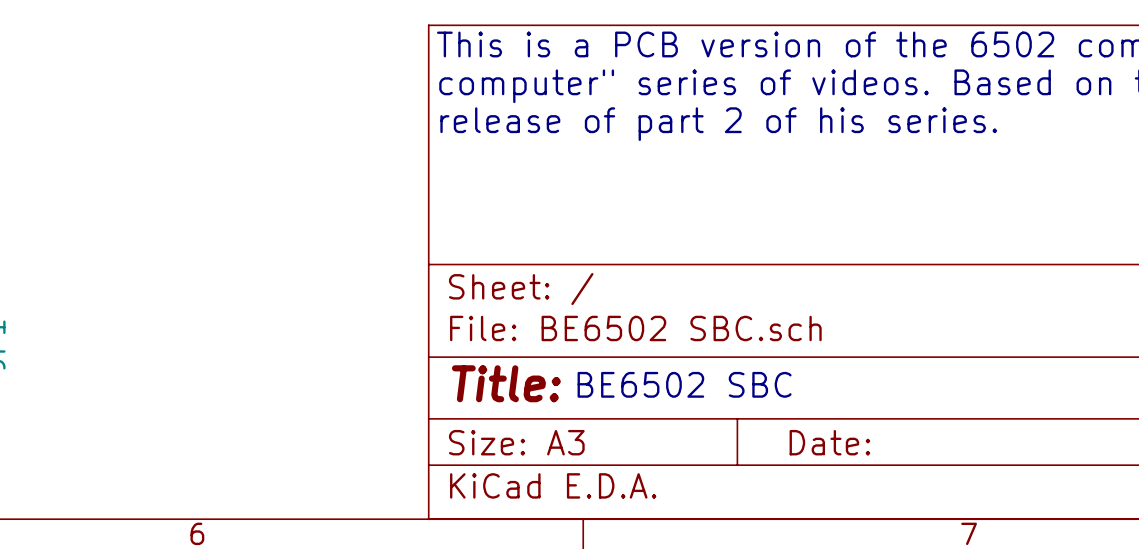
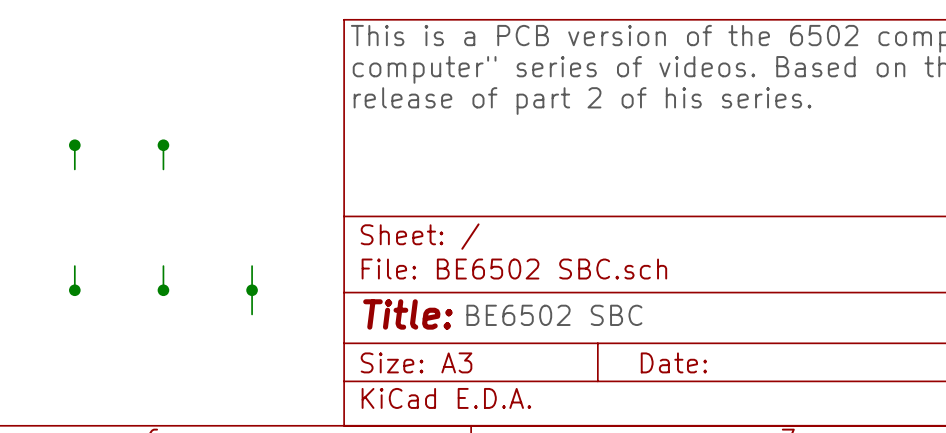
wire: none -> (74, 145) (74, 169)
junction: none -> (74, 145)
wire: none -> (163, 145) (163, 169)
junction: none -> (163, 145)
wire: none -> (74, 266) (74, 290)
wire: none -> (163, 266) (163, 290)
wire: none -> (252, 266) (252, 314)
junction: none -> (74, 290)
junction: none -> (163, 290)
junction: none -> (252, 290)

